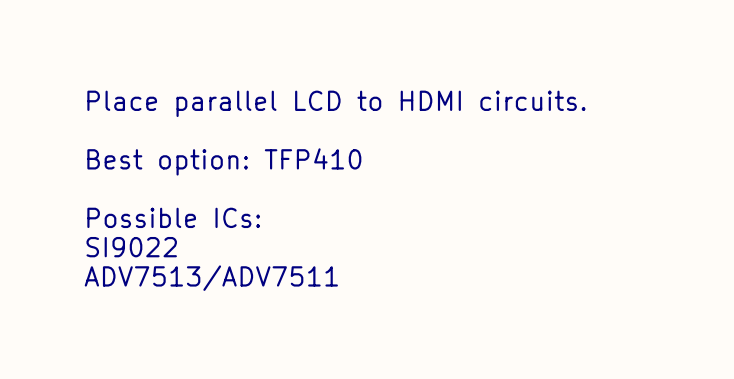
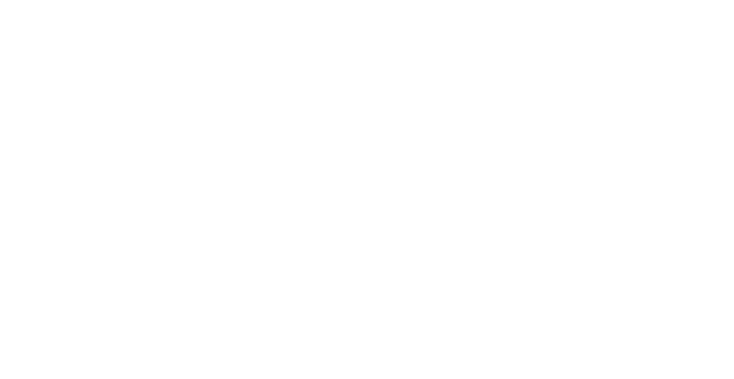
text: Place parallel LCD to HDMI circuits. (336, 103) -> none
text: Best option: TFP410 (224, 161) -> none
text: Possible ICs: (173, 217) -> none
text: SI9022 (131, 247) -> none
text: ADV7513/ADV7511 (211, 278) -> none

